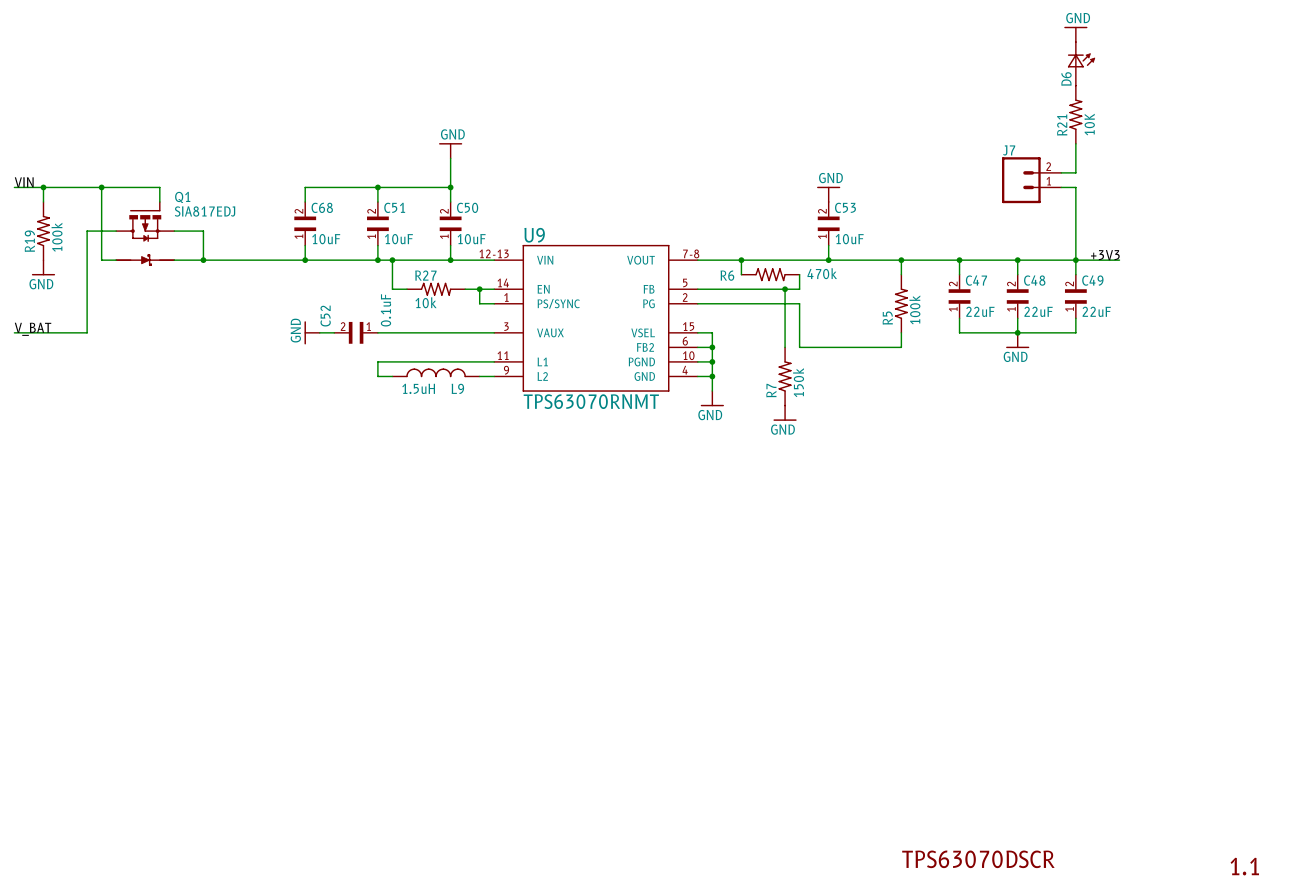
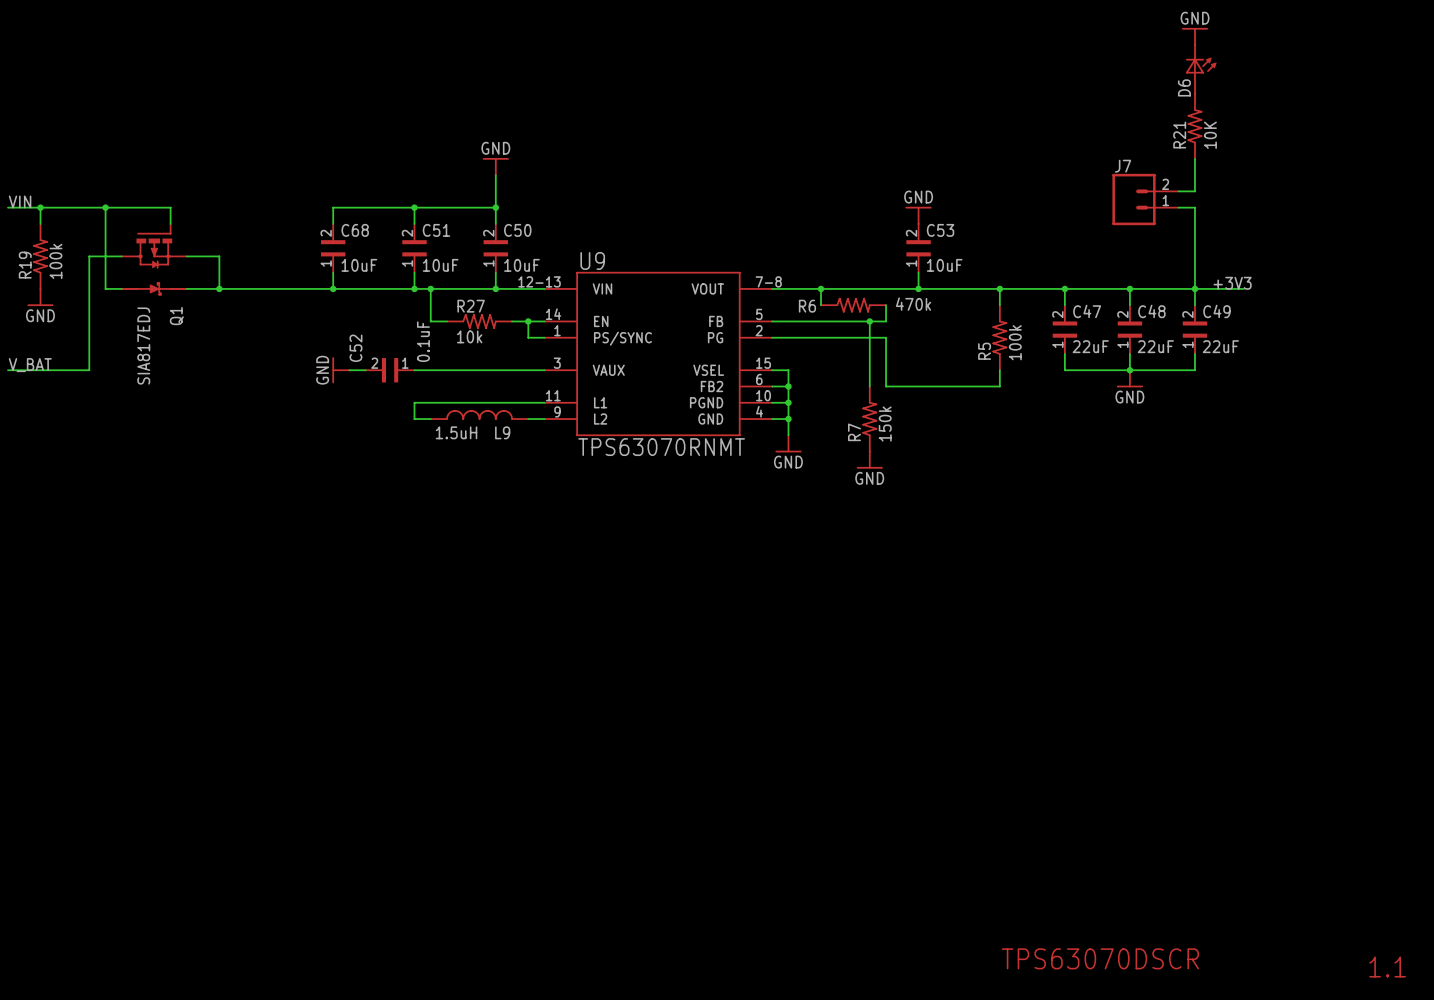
Q1 name rotation: 0° (182, 197) -> 90° counterclockwise (176, 316)
Q1 name position: Q1 (182, 197) -> Q1 (176, 316)
Q1 value rotation: 0° (205, 211) -> 90° counterclockwise (143, 346)
Q1 value position: SIA817EDJ (205, 211) -> SIA817EDJ (143, 346)

